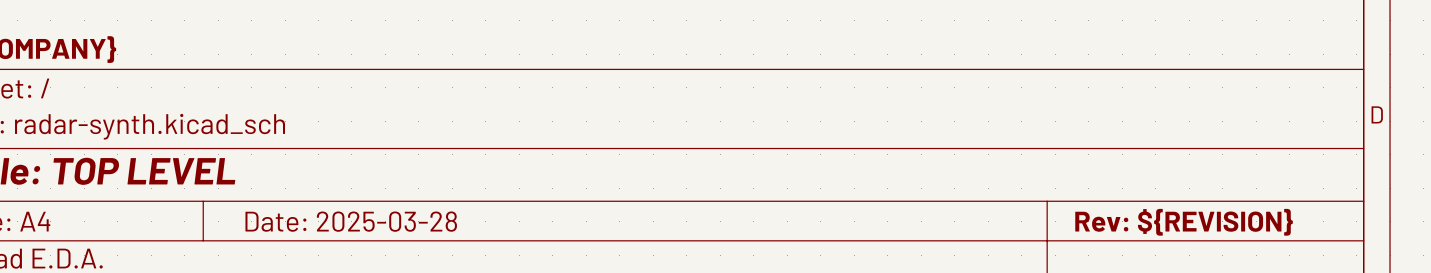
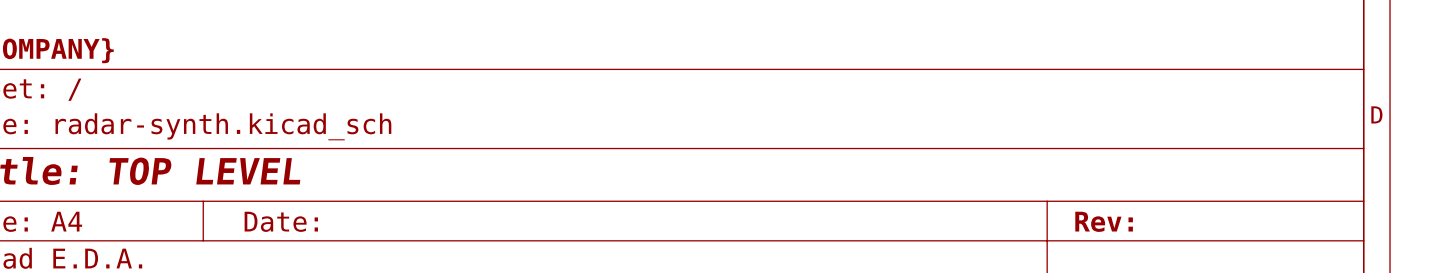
title block: Date: 2025-03-28 (351, 221) -> Date: (281, 221)
title block: Rev: ${REVISION} (1184, 222) -> Rev: (1104, 221)

